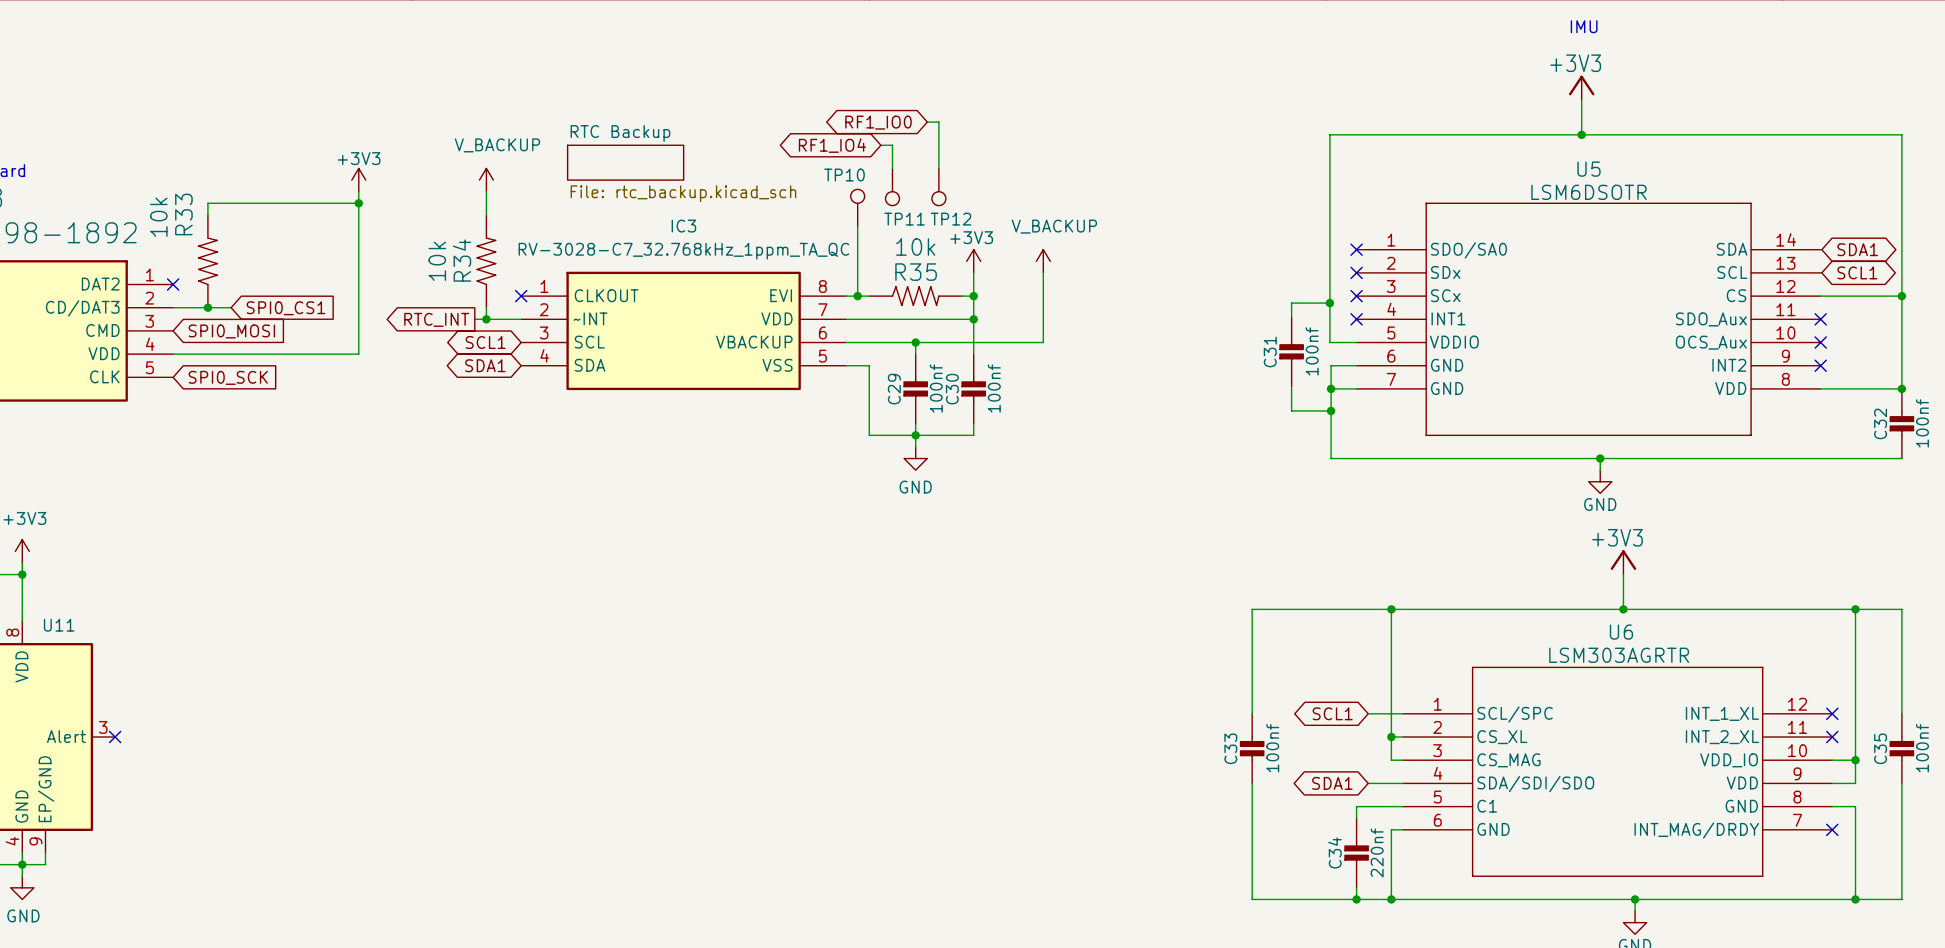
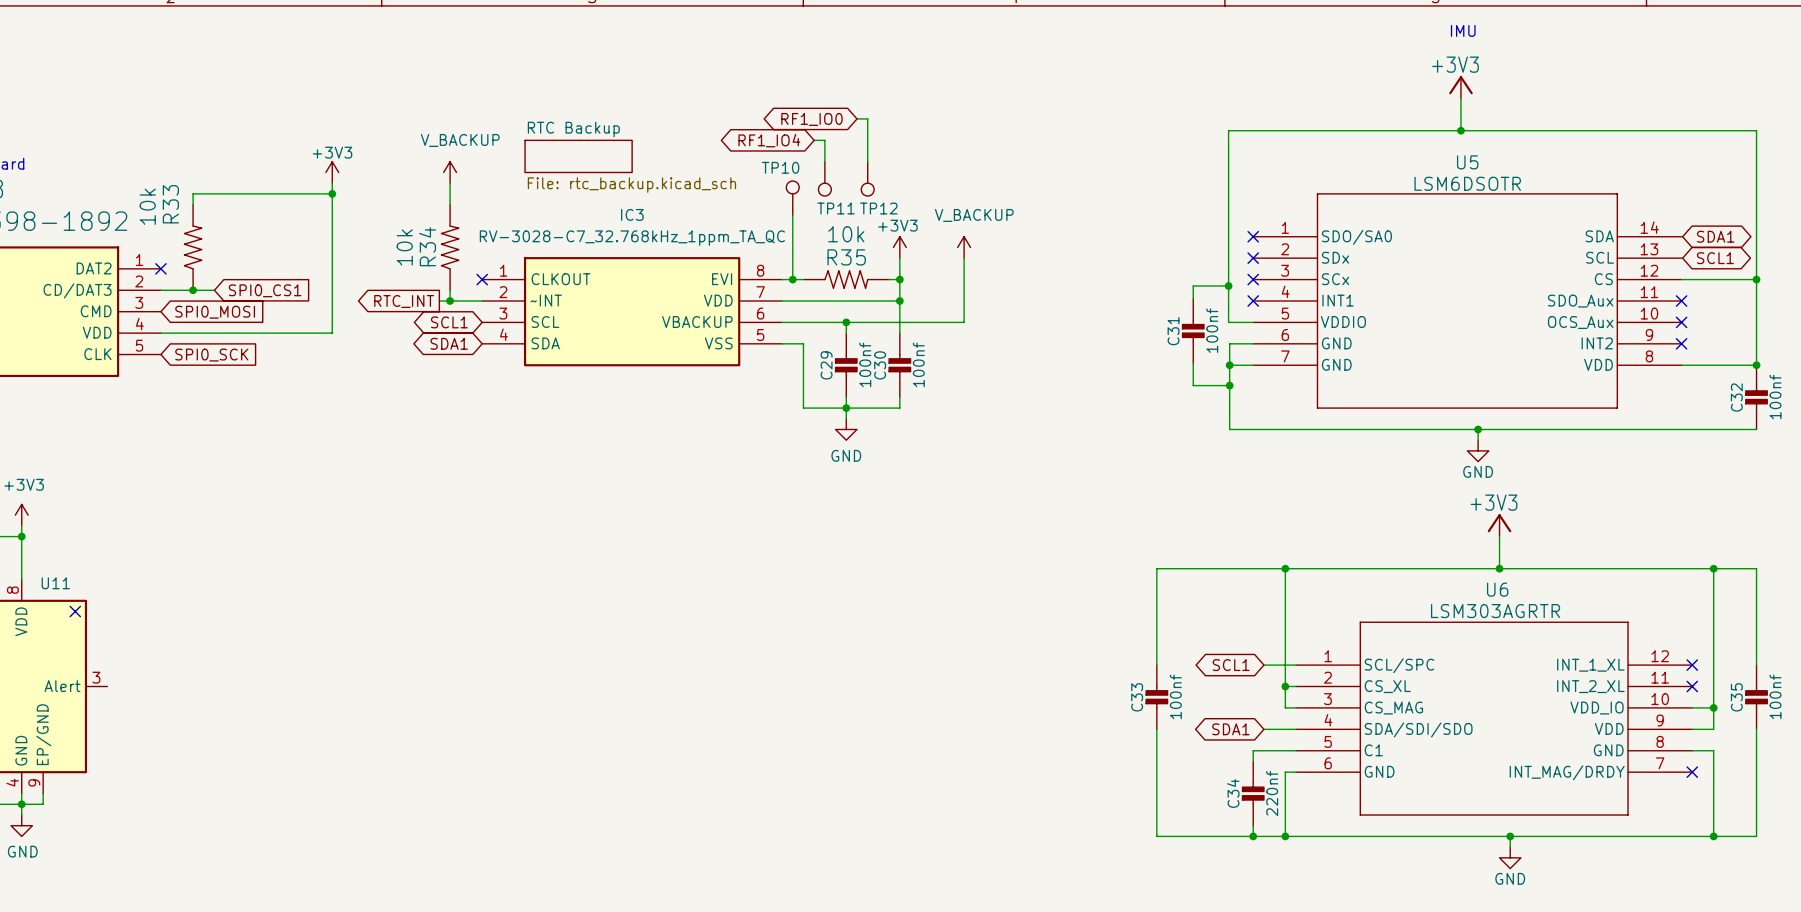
no-connect mark: none -> (75, 611)
no-connect mark: (115, 737) -> none

